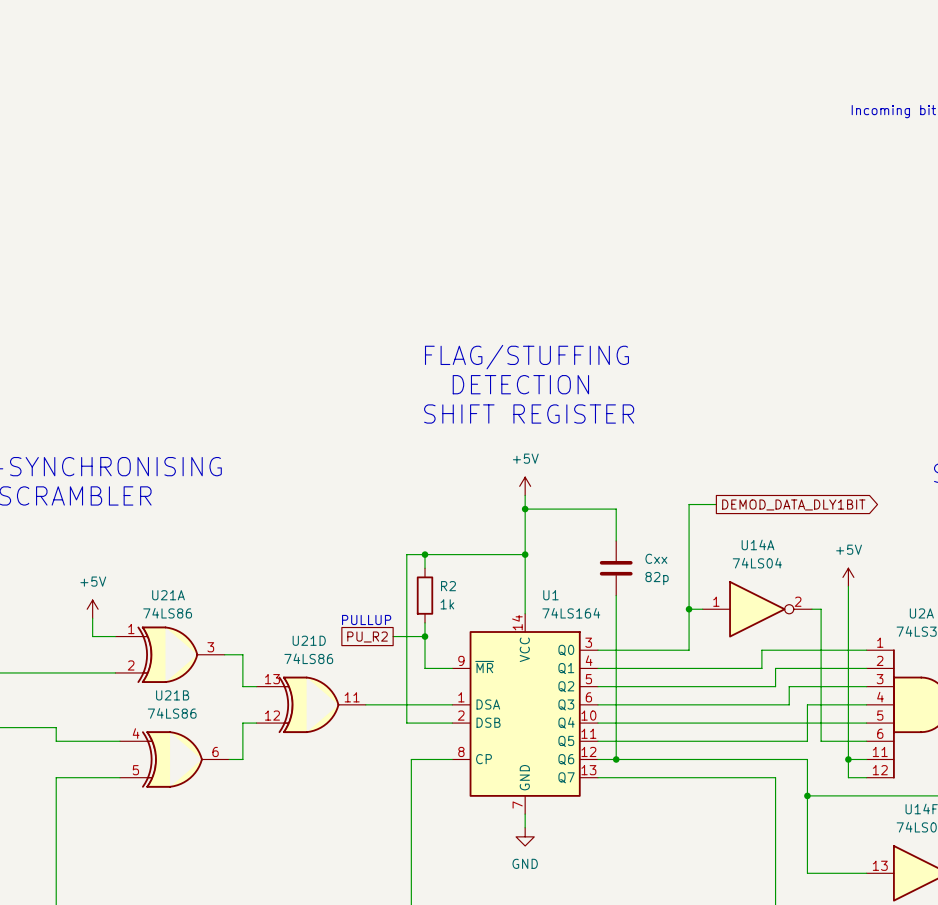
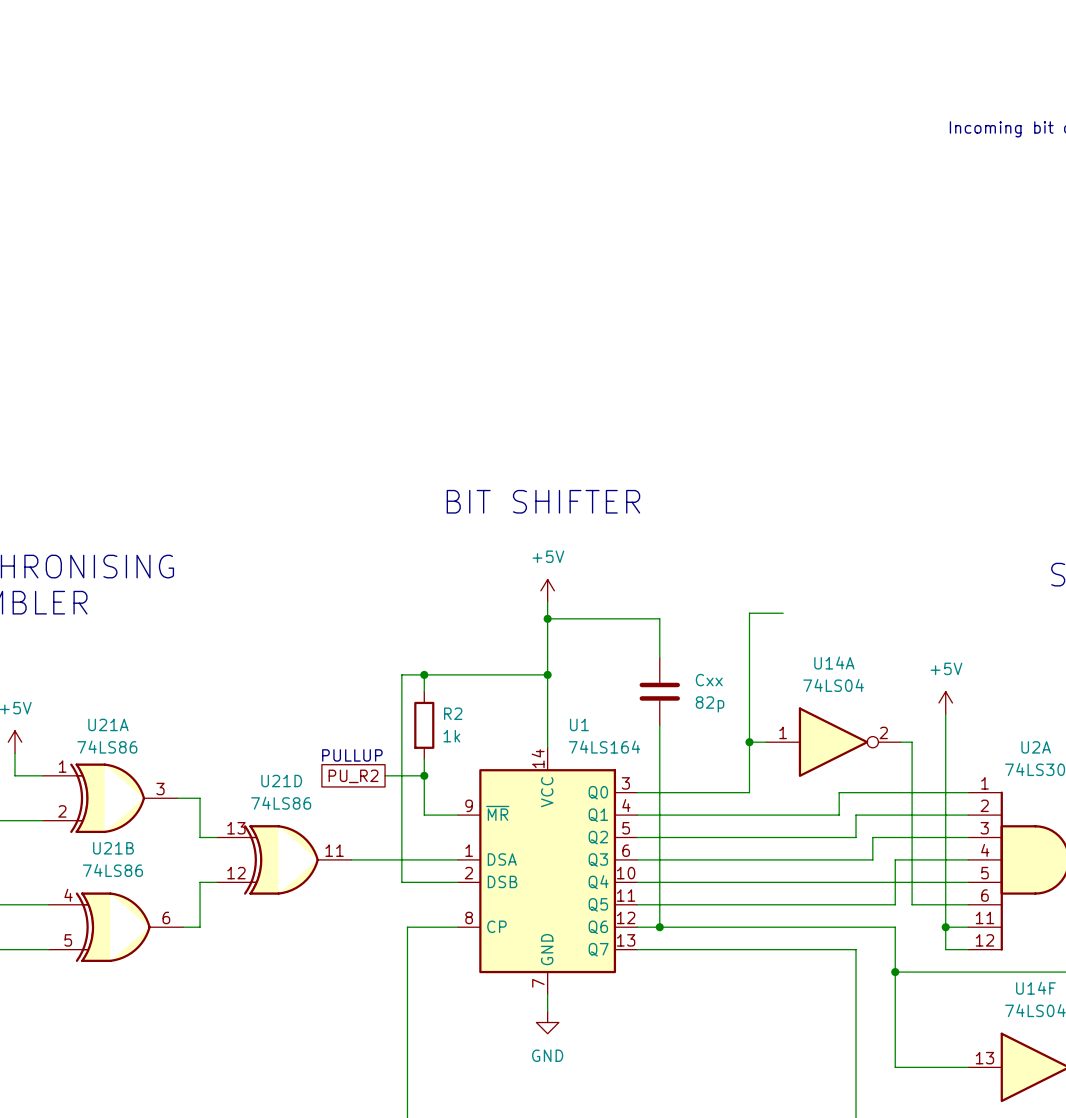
text: FLAG/STUFFING (526, 357) -> none
text: DETECTION (520, 384) -> none
text: none -> BIT SHIFTER (543, 501)
text: SHIFT REGISTER (529, 414) -> none
global label: DEMOD_DATA_DLY1BIT (793, 504) -> none

